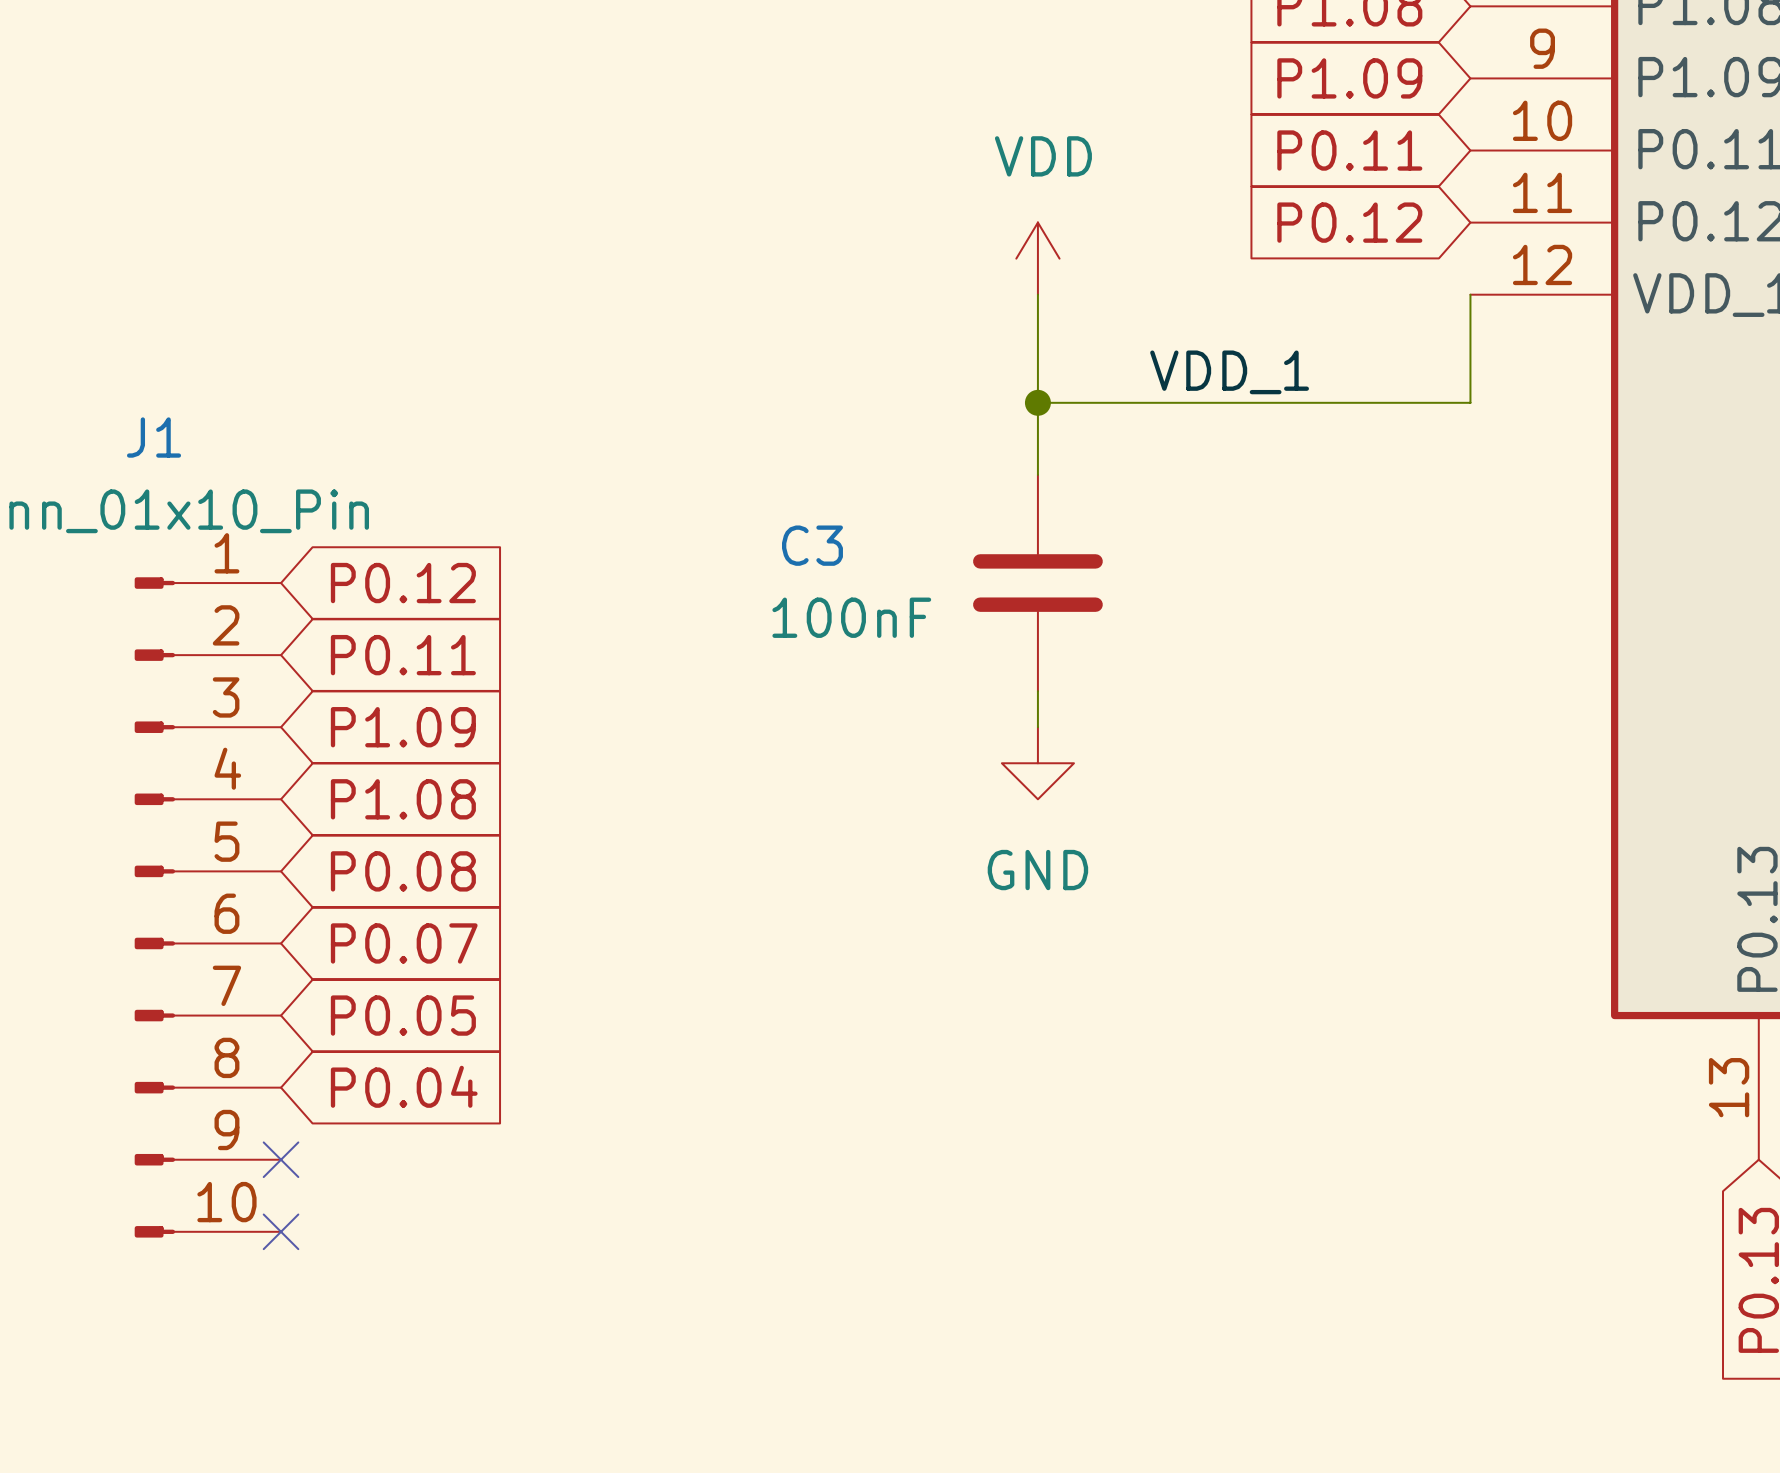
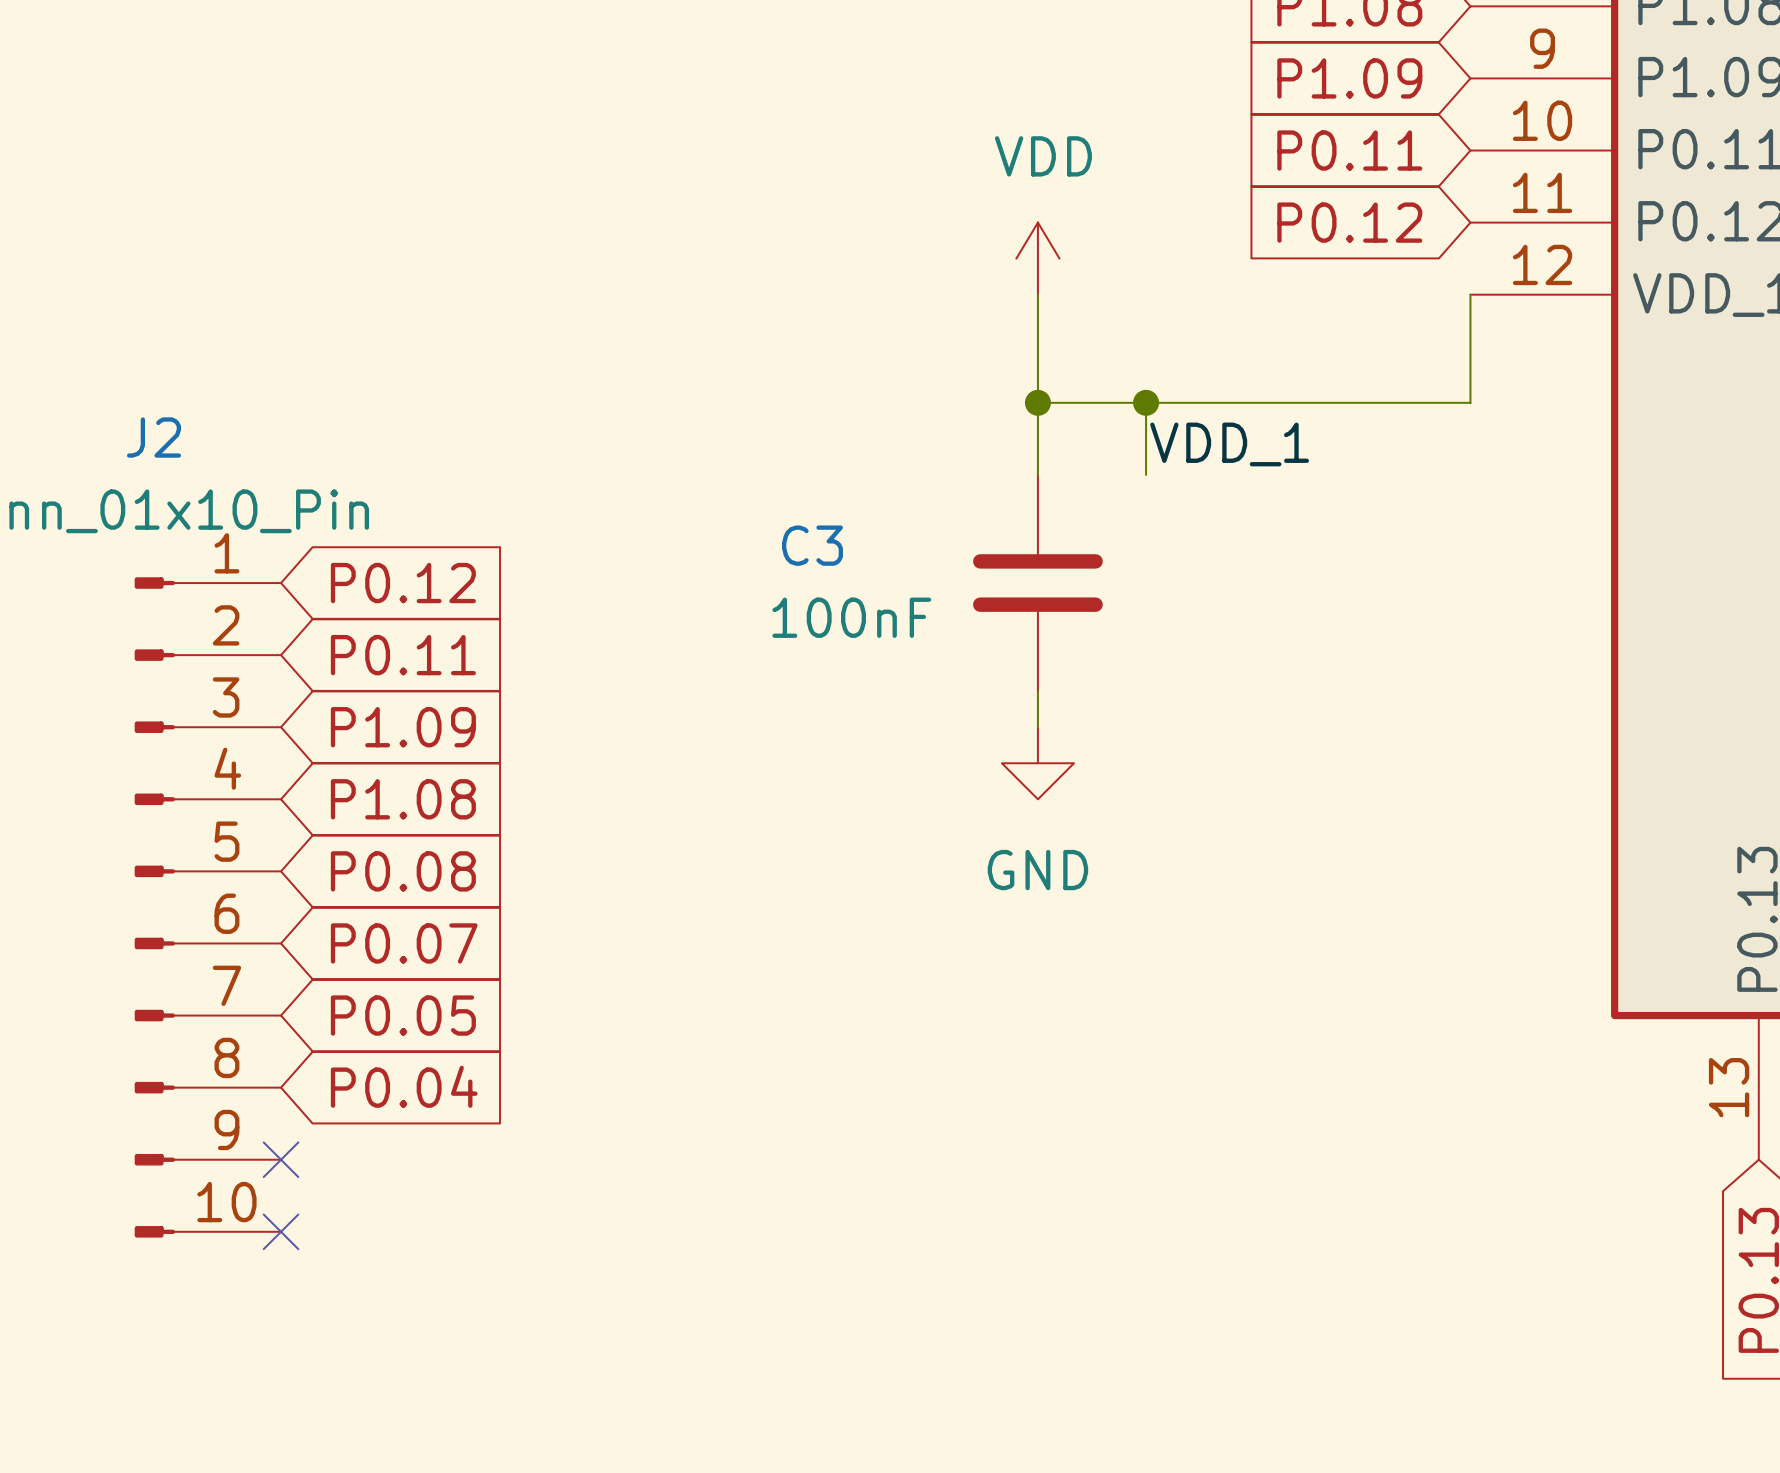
label position: VDD_1 (1229, 372) -> VDD_1 (1229, 444)
wire: none -> (1146, 402) (1146, 474)
junction: none -> (1146, 402)
J1 name: J1 (154, 437) -> J2 (154, 437)

